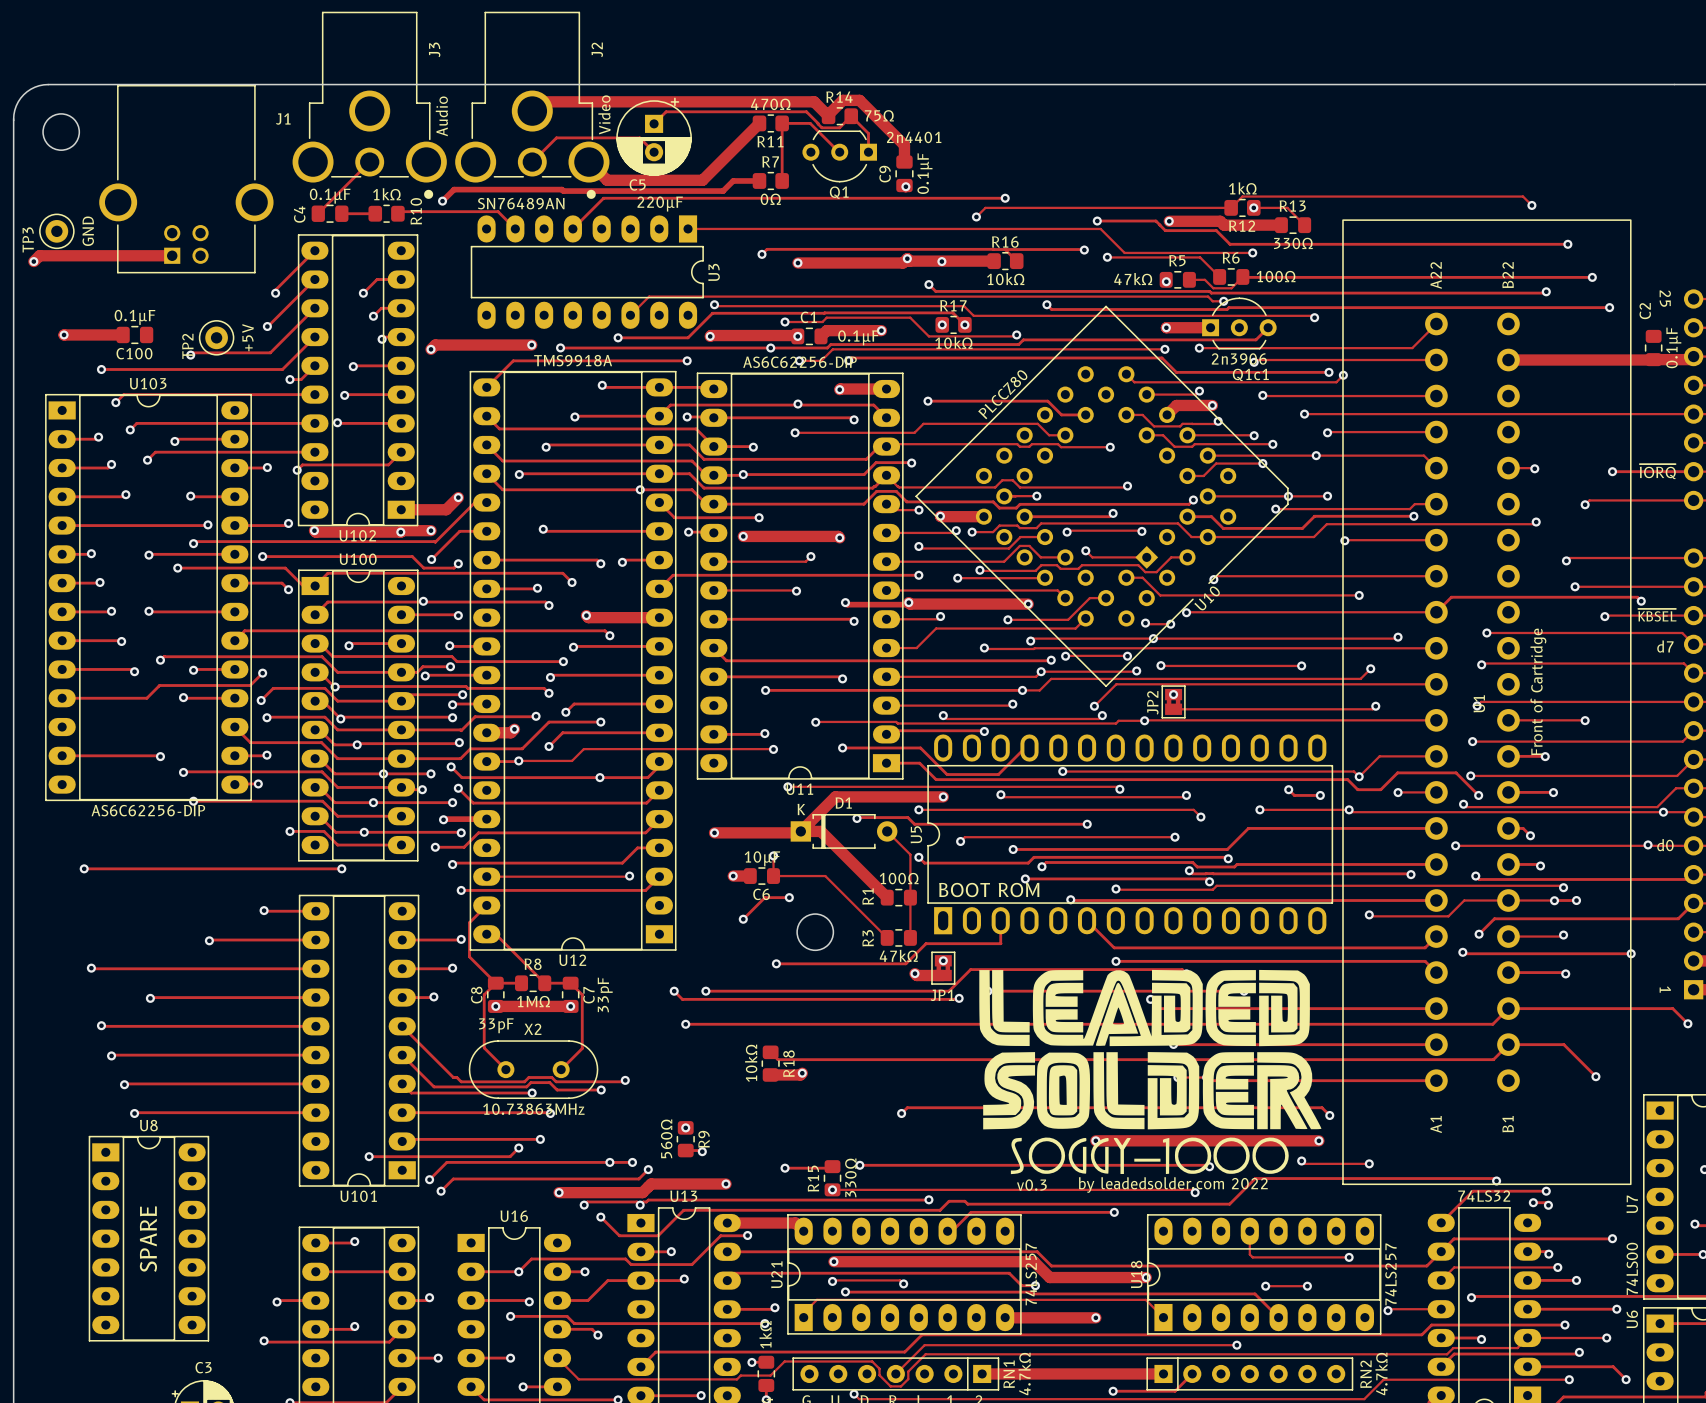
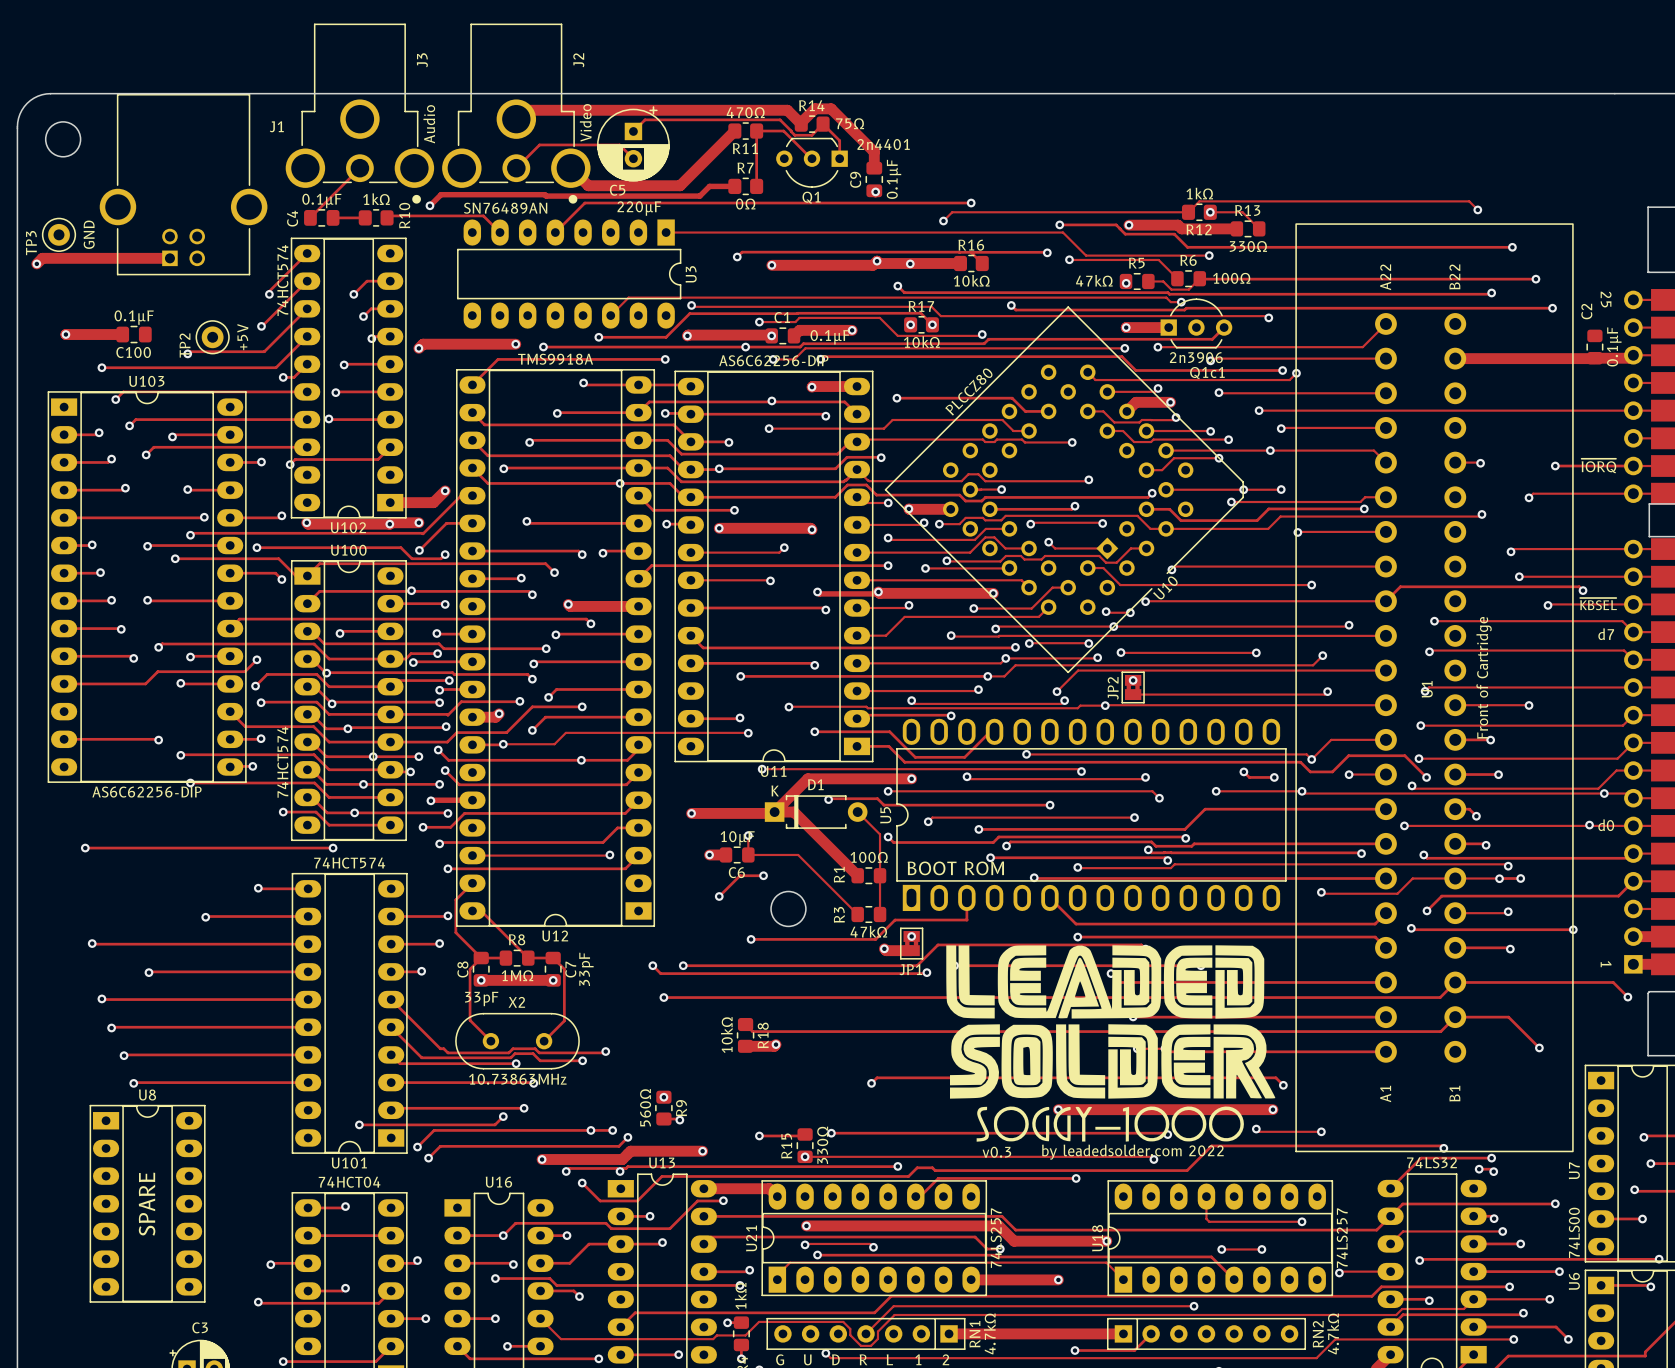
U102 value: none -> 74HCT574 (282, 280)
U100 value: none -> 74HCT574 (282, 762)
U101 value: none -> 74HCT574 (349, 863)
part value: none -> 74HCT04 (349, 1182)

